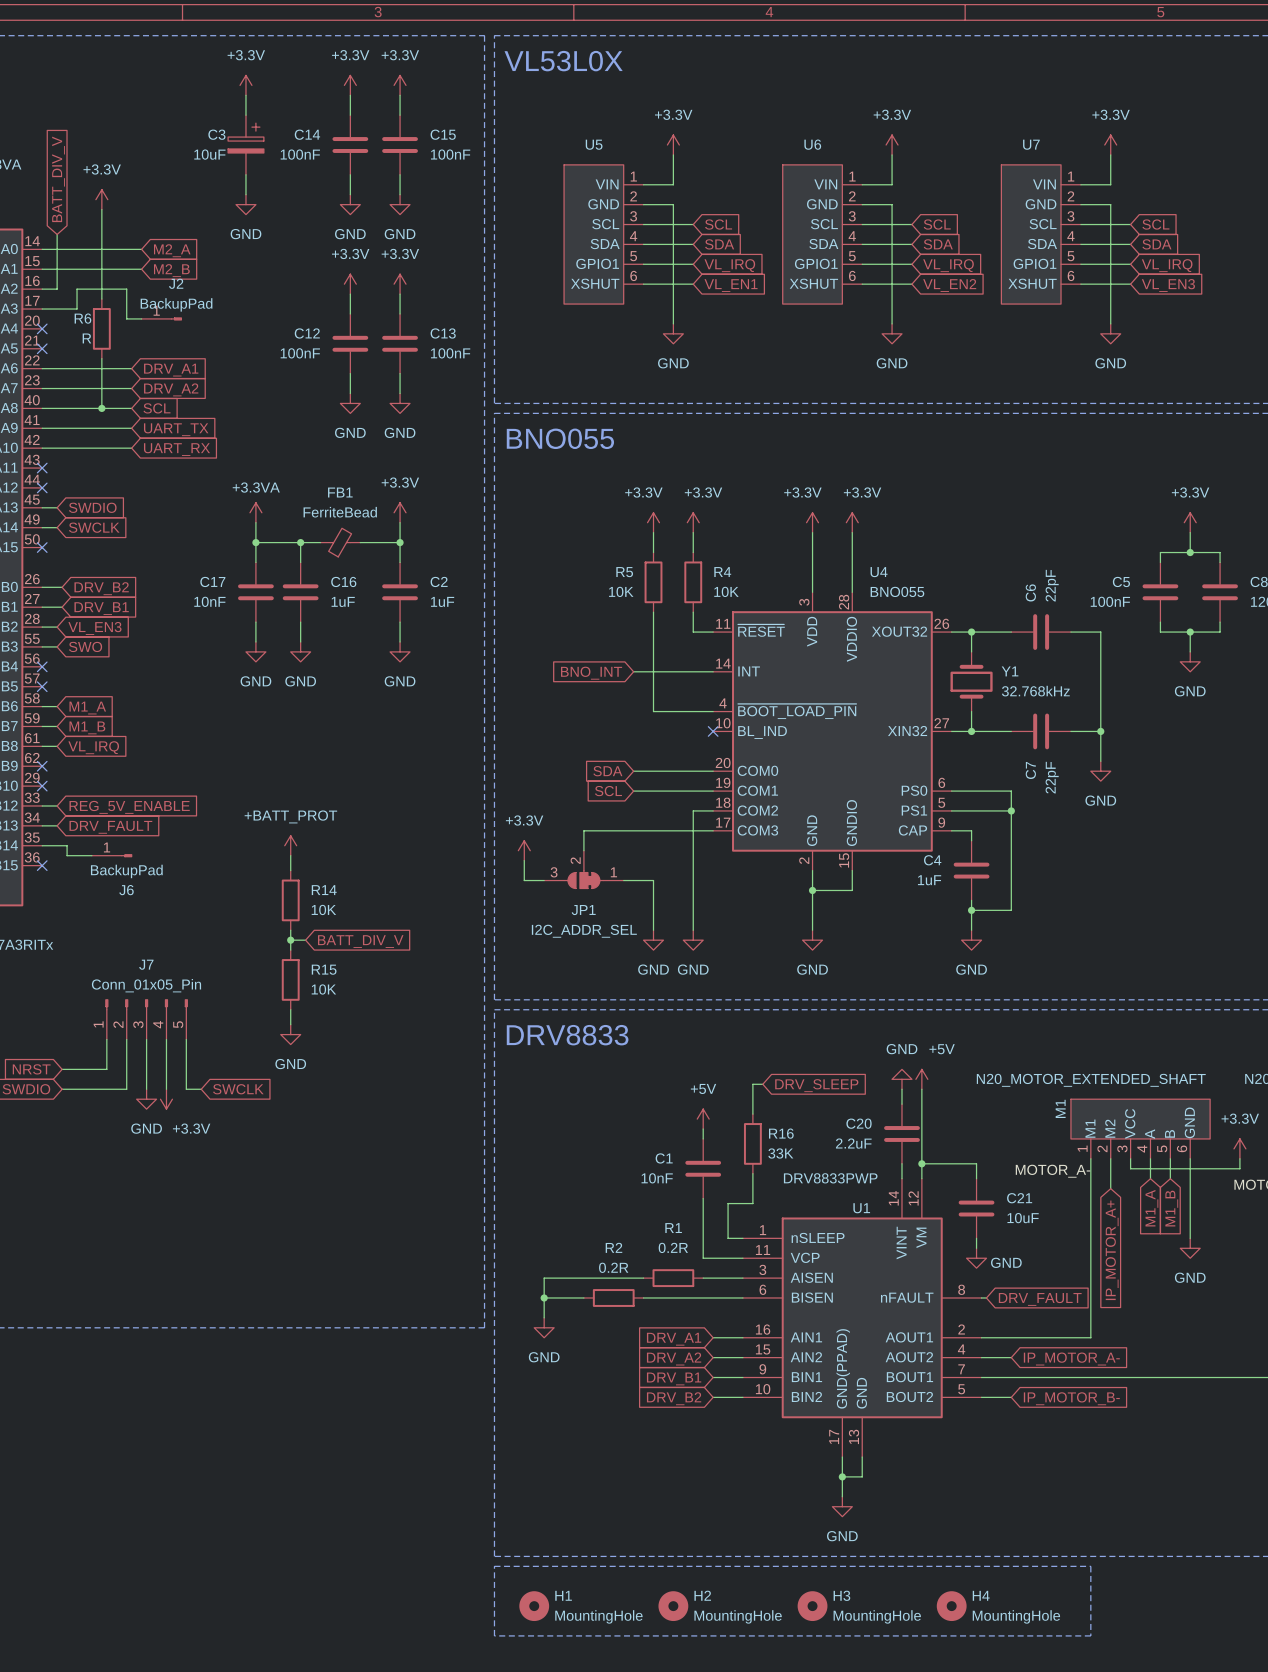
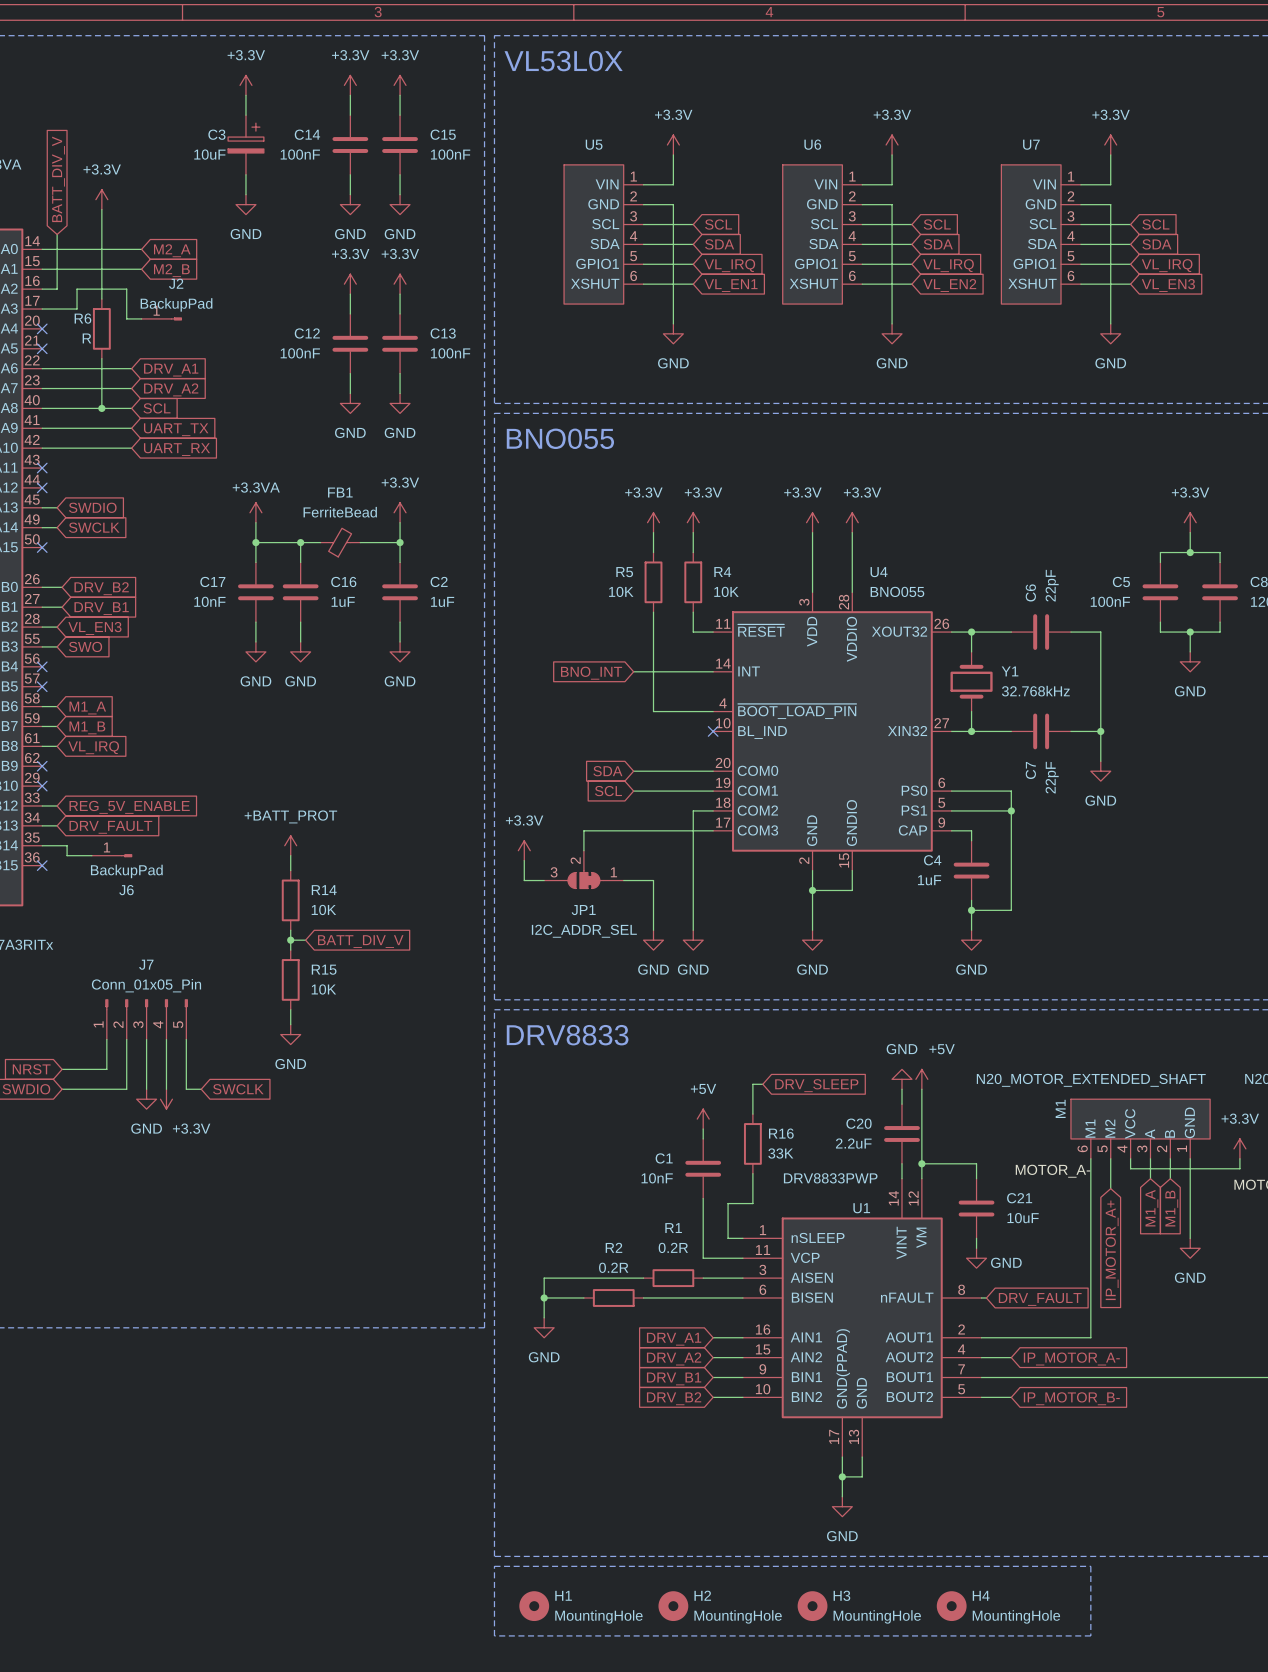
M1 pin number: 1 (1082, 1148) -> 6 (1082, 1148)
M1 pin number: 2 (1102, 1148) -> 5 (1102, 1148)
M1 pin number: 3 (1122, 1148) -> 4 (1122, 1148)
M1 pin number: 4 (1142, 1148) -> 3 (1142, 1148)
M1 pin number: 5 (1162, 1148) -> 2 (1162, 1148)
M1 pin number: 6 (1182, 1148) -> 1 (1182, 1148)

